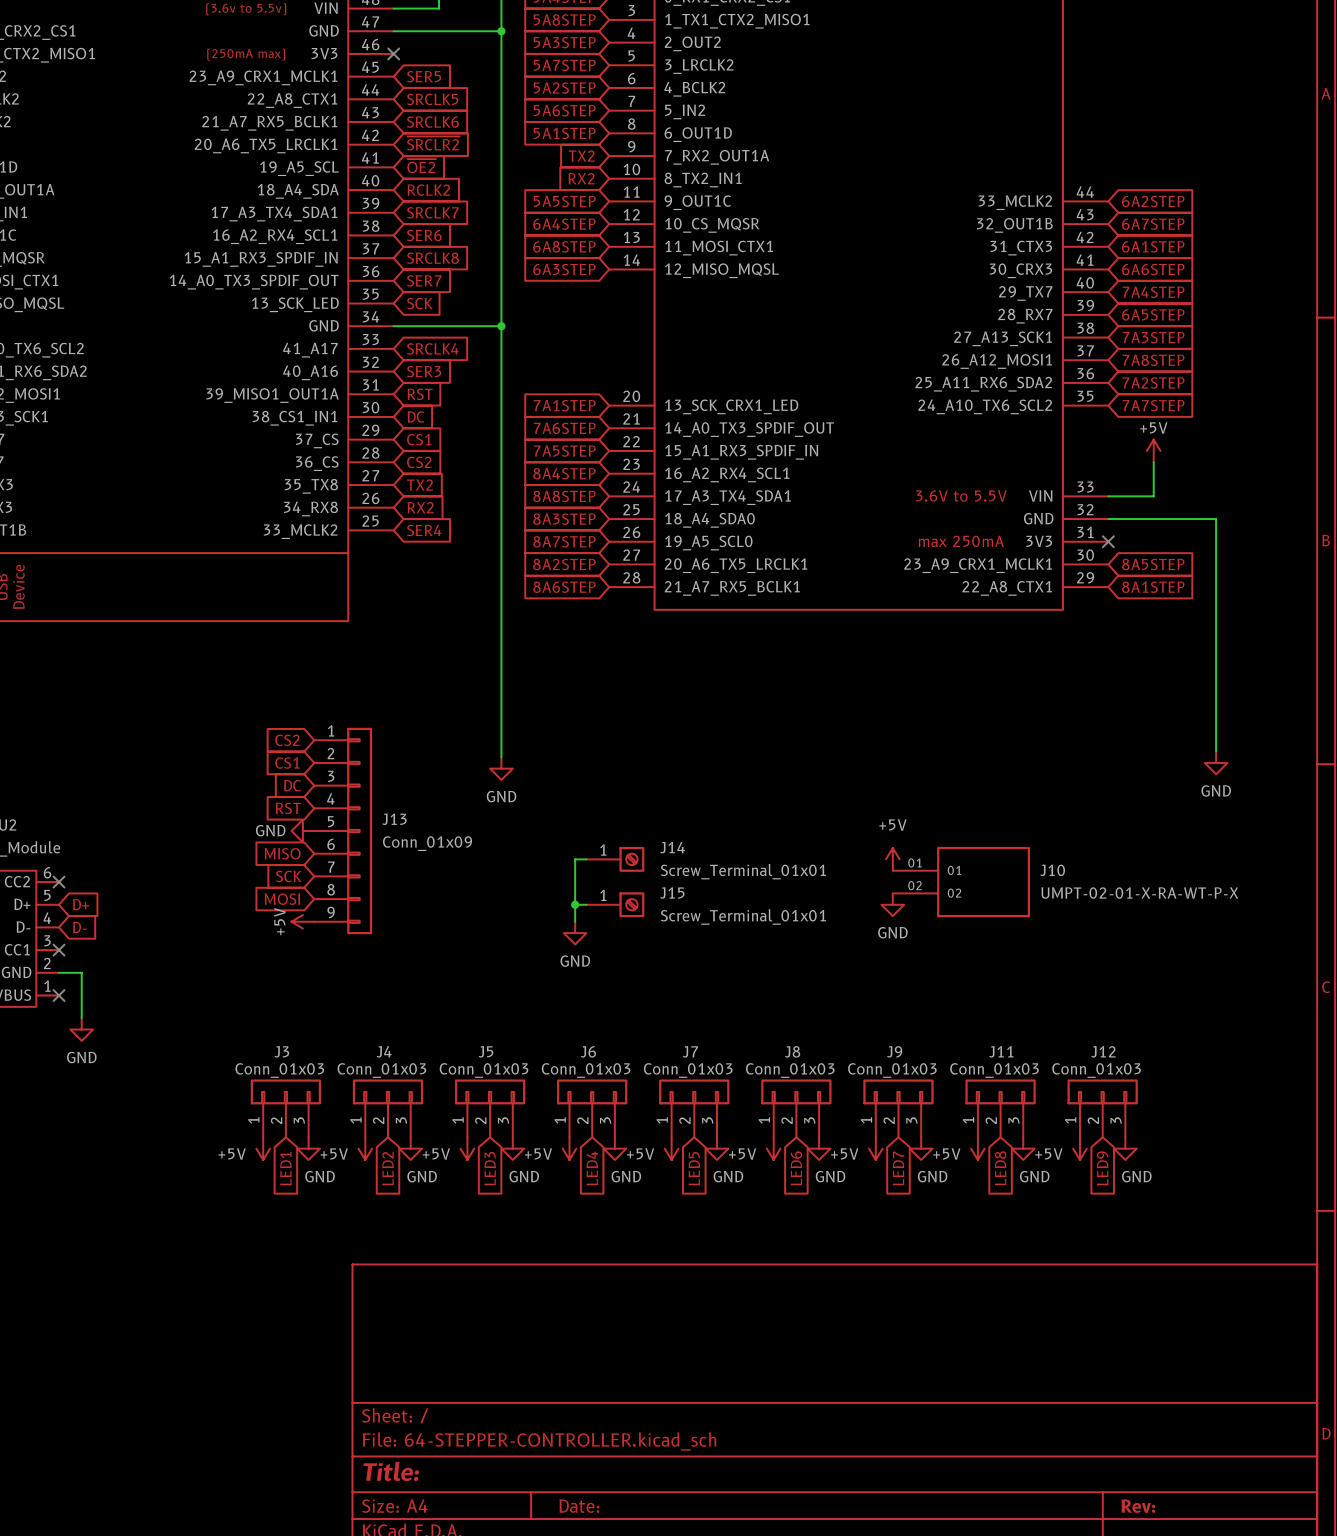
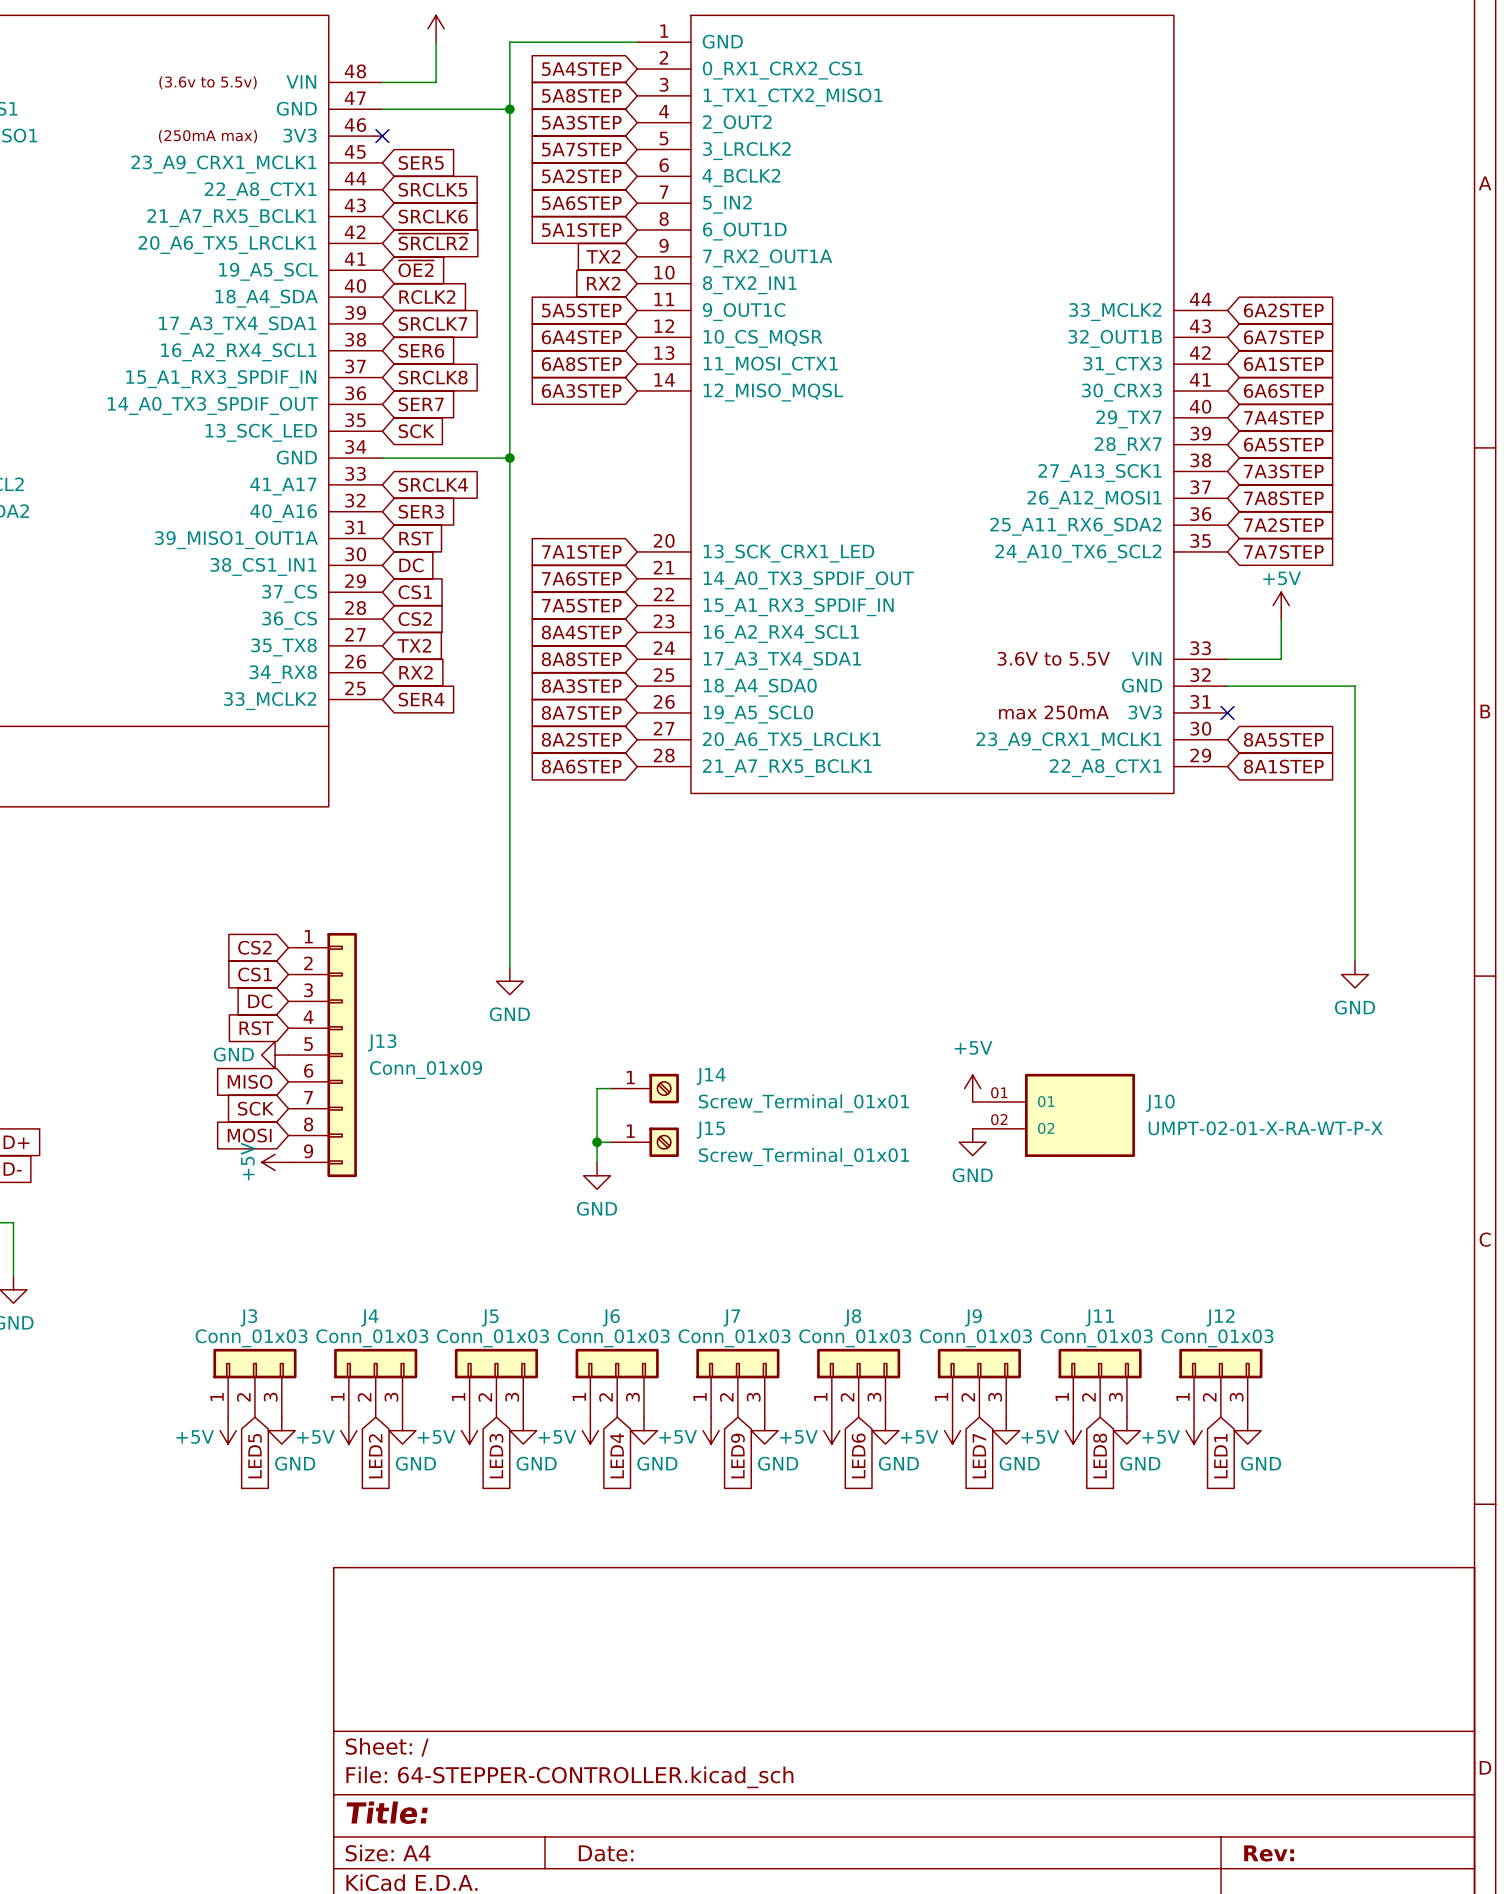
global label: LED1 (285, 1168) -> LED5 (255, 1456)
global label: LED5 (694, 1168) -> LED9 (737, 1455)
global label: LED9 (1102, 1168) -> LED1 (1220, 1456)

